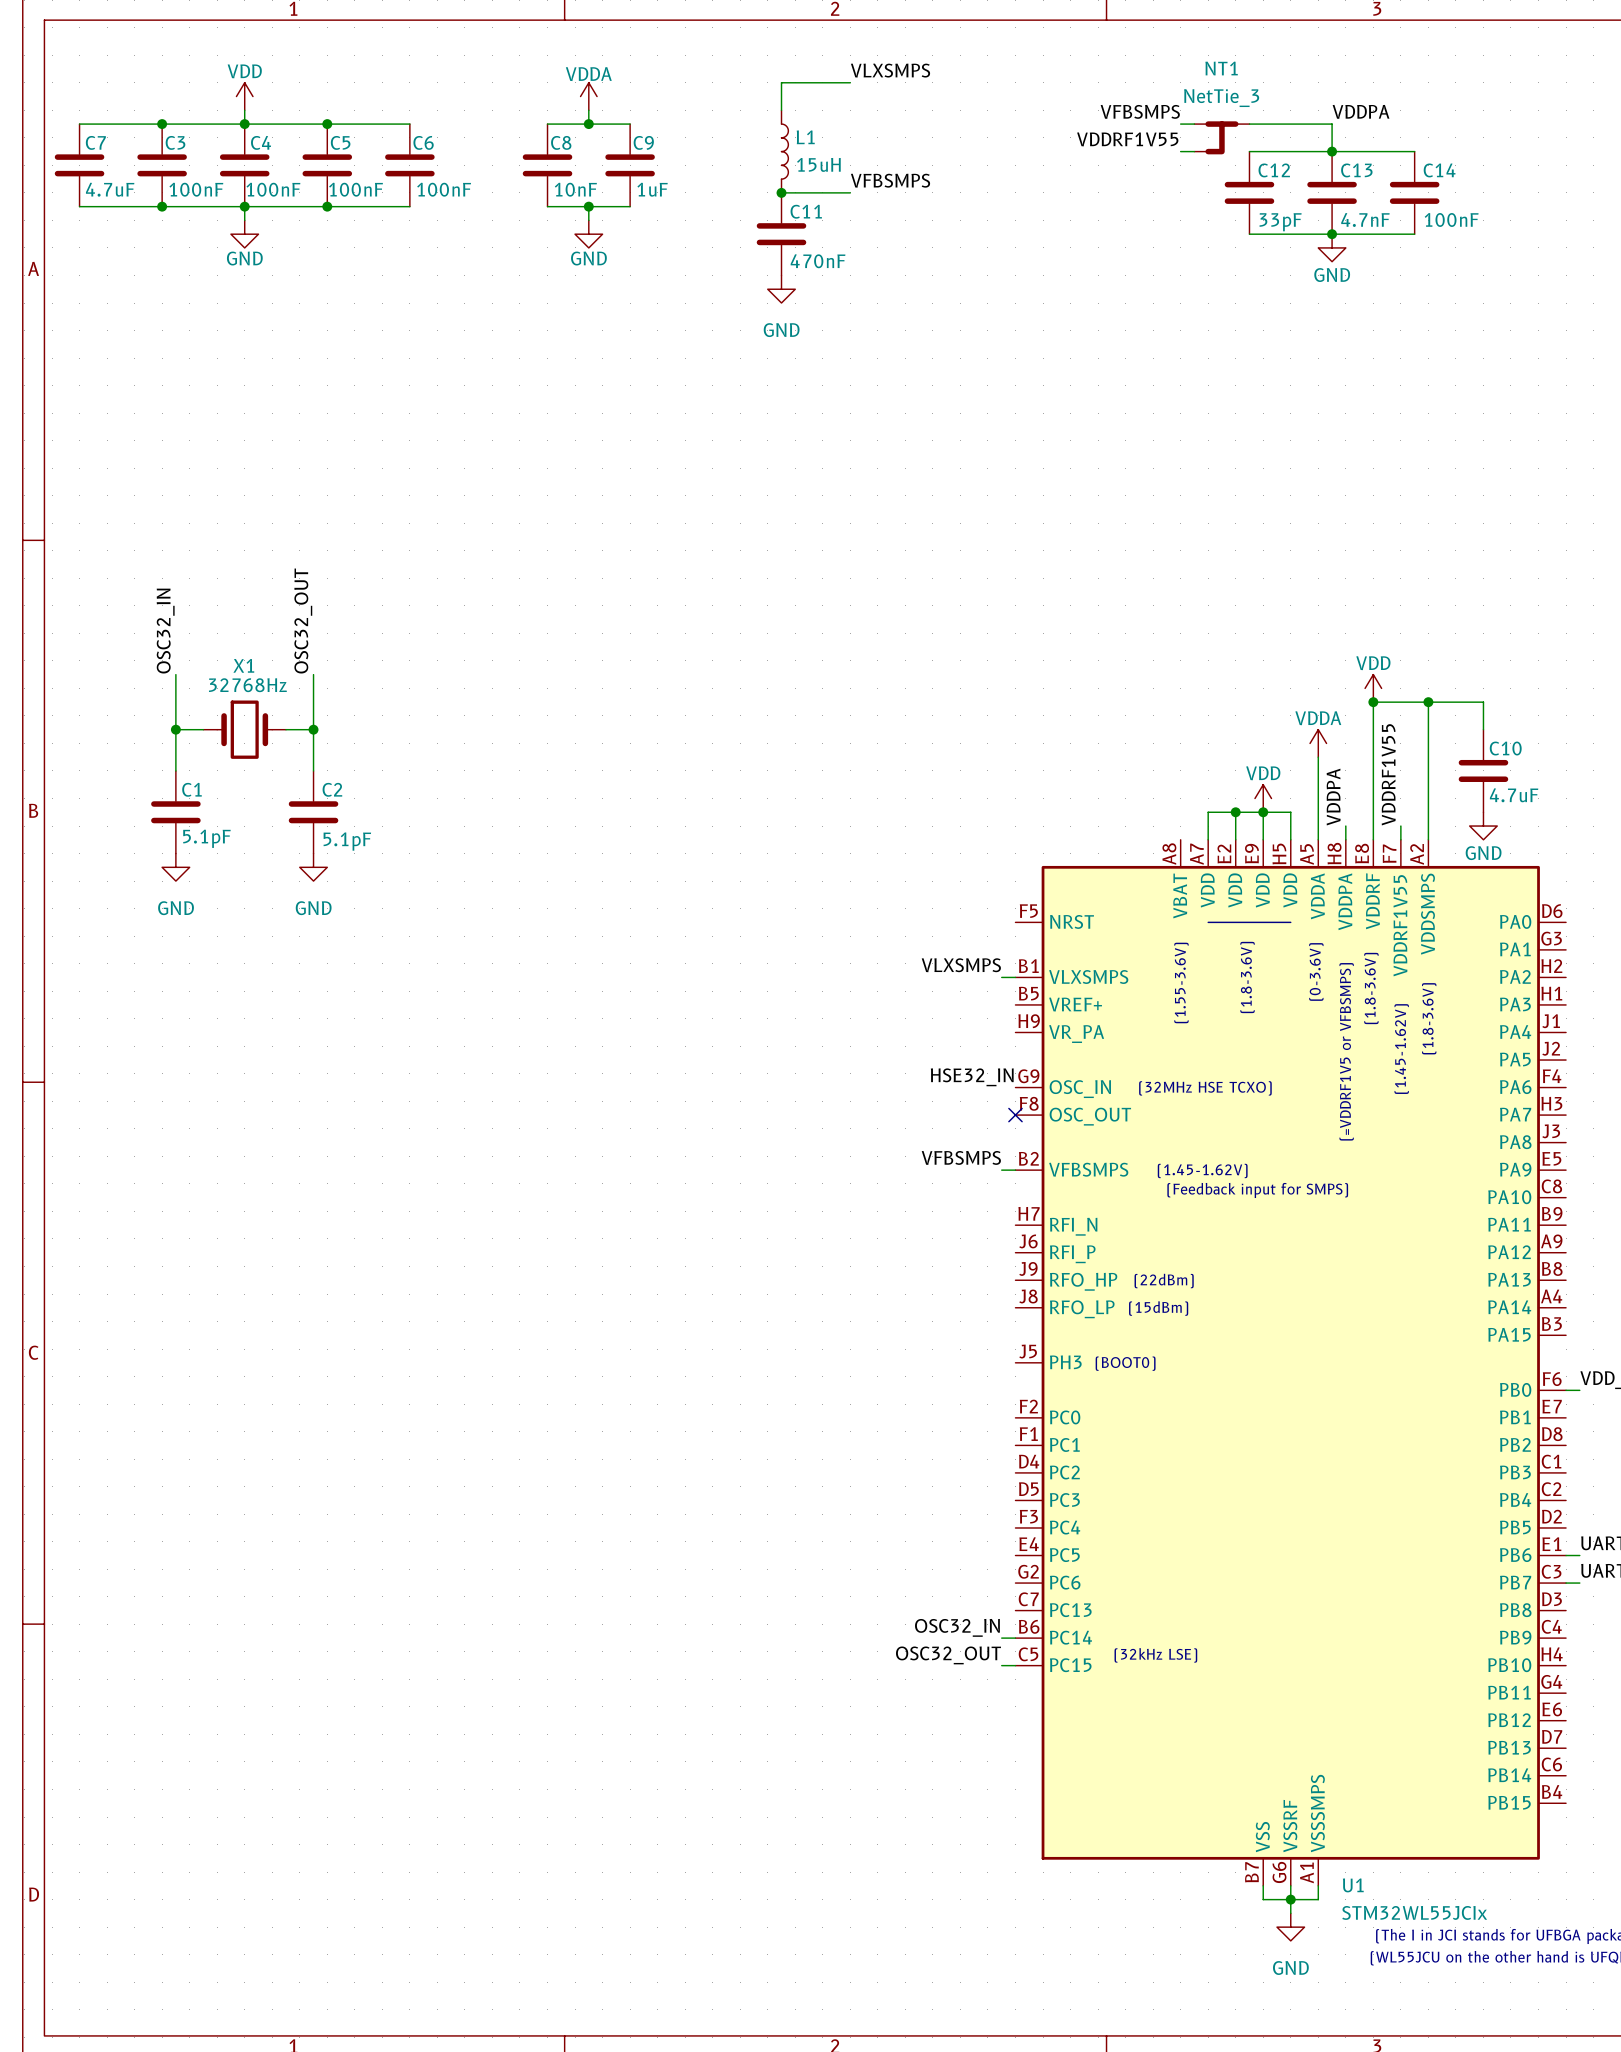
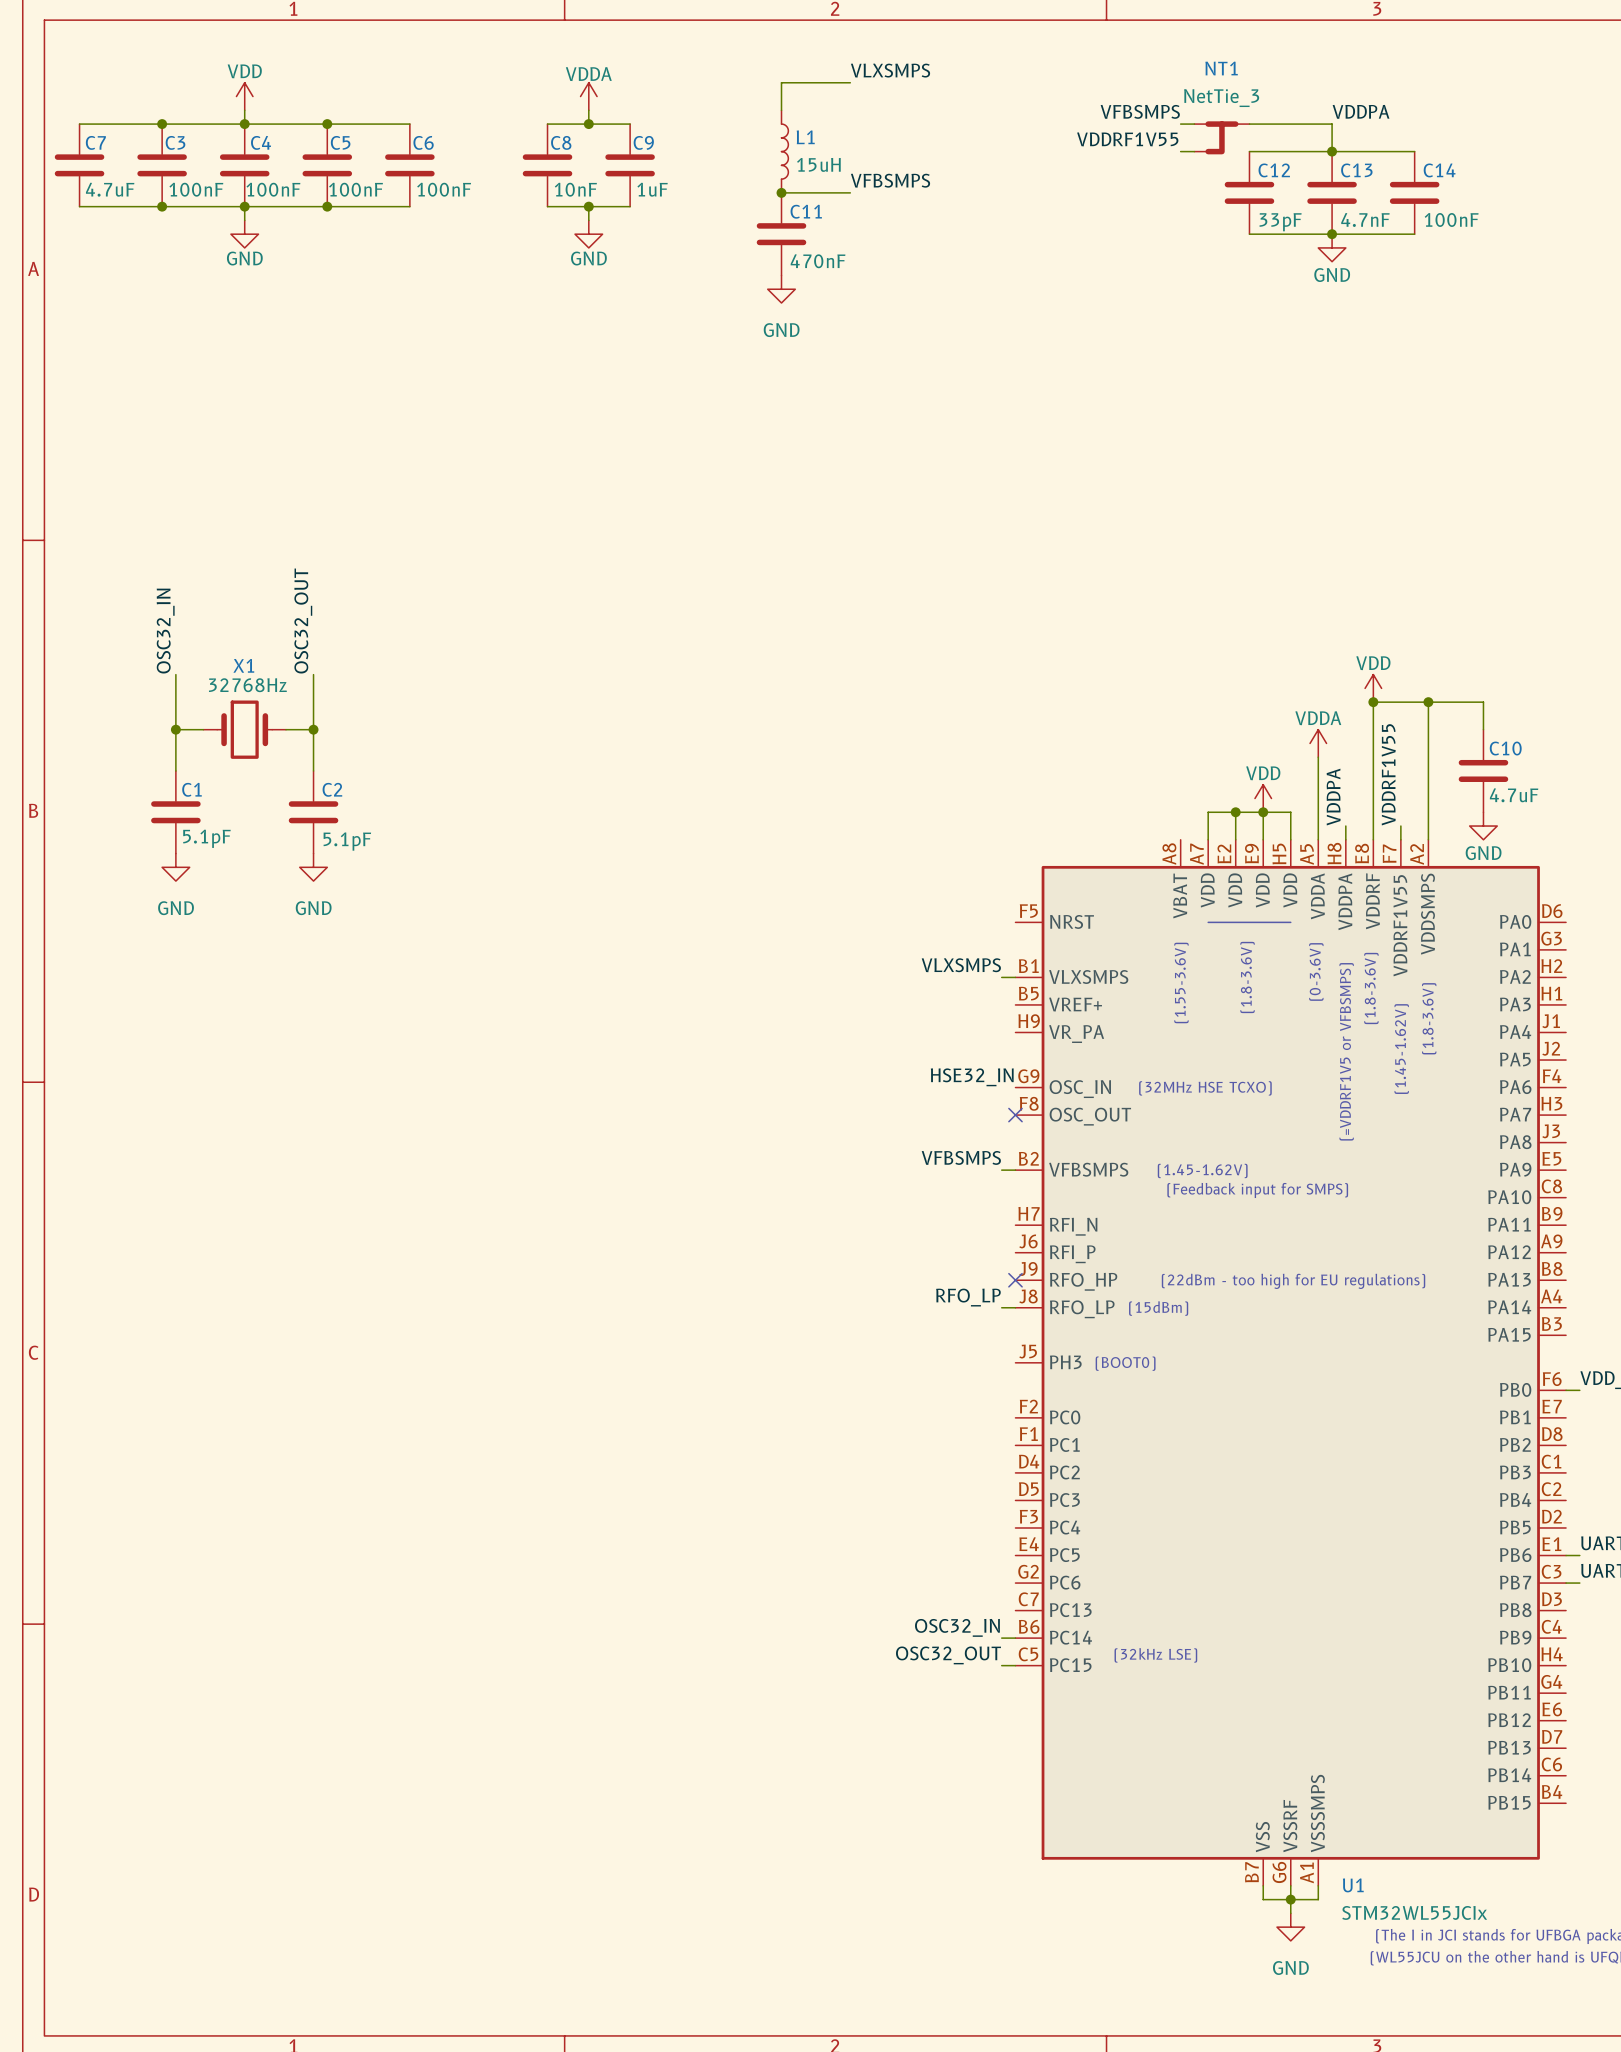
no-connect mark: none -> (1015, 1280)
text: (22dBm) (1164, 1281) -> none
text: none -> (22dBm - too high for EU regulations) (1293, 1281)
label: none -> RFO_LP (968, 1297)
wire: none -> (1001, 1307) (1015, 1307)

